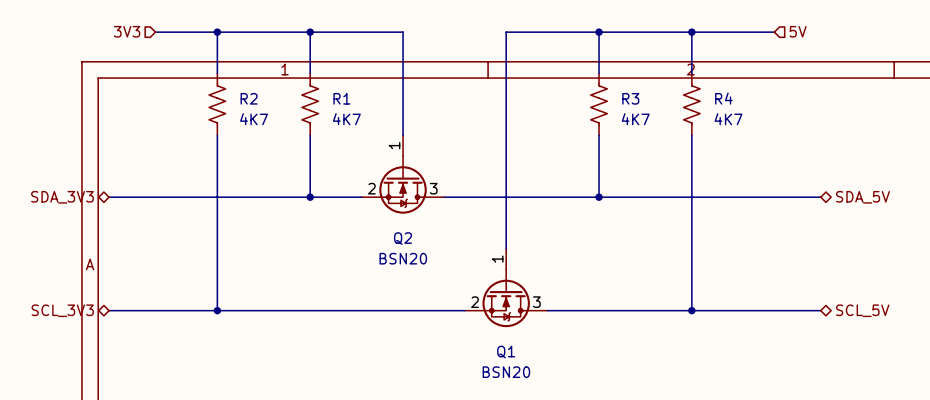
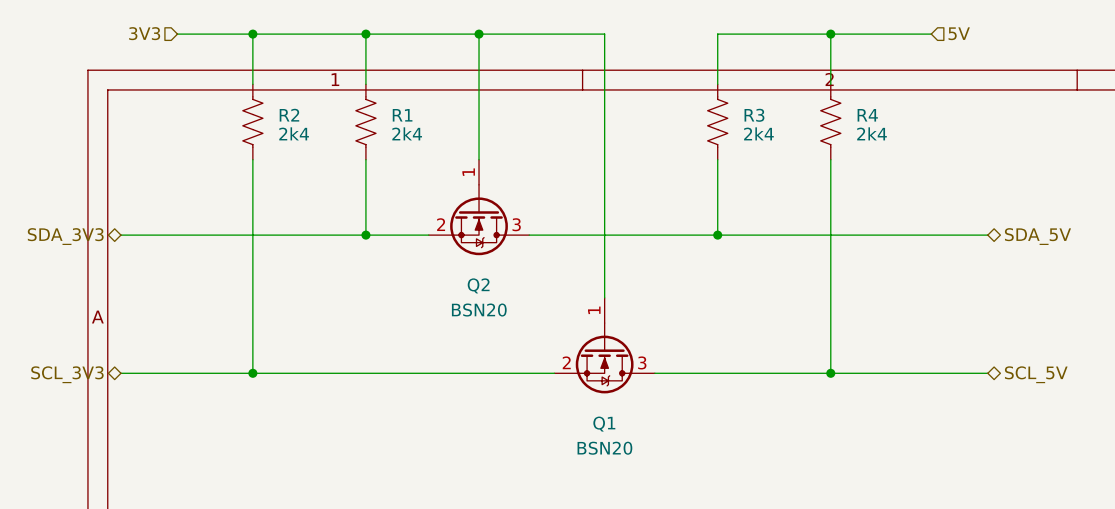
junction: none -> (479, 34)
wire: (506, 32) (599, 32) -> (604, 34) (479, 34)
junction: (599, 32) -> none
R2 value: 4K7 (254, 119) -> 2k4 (294, 133)
R1 value: 4K7 (346, 119) -> 2k4 (407, 133)
R3 value: 4K7 (635, 119) -> 2k4 (758, 133)
R4 value: 4K7 (728, 119) -> 2k4 (872, 133)

